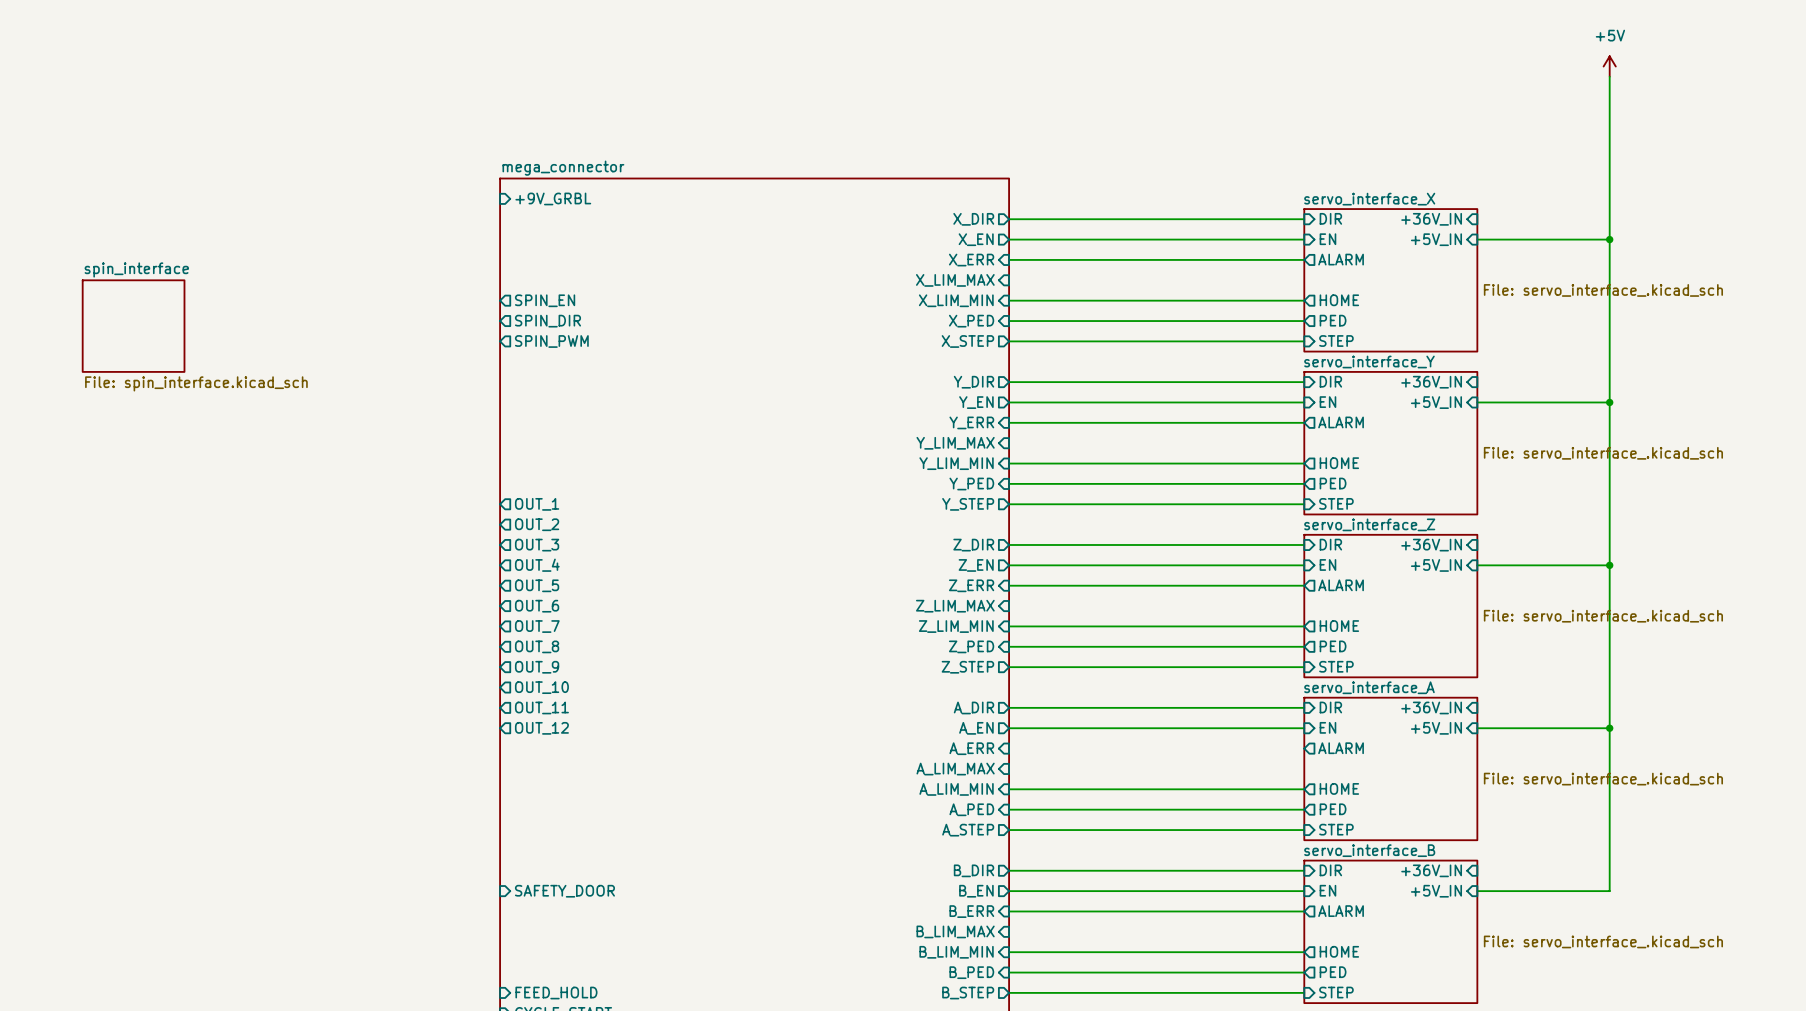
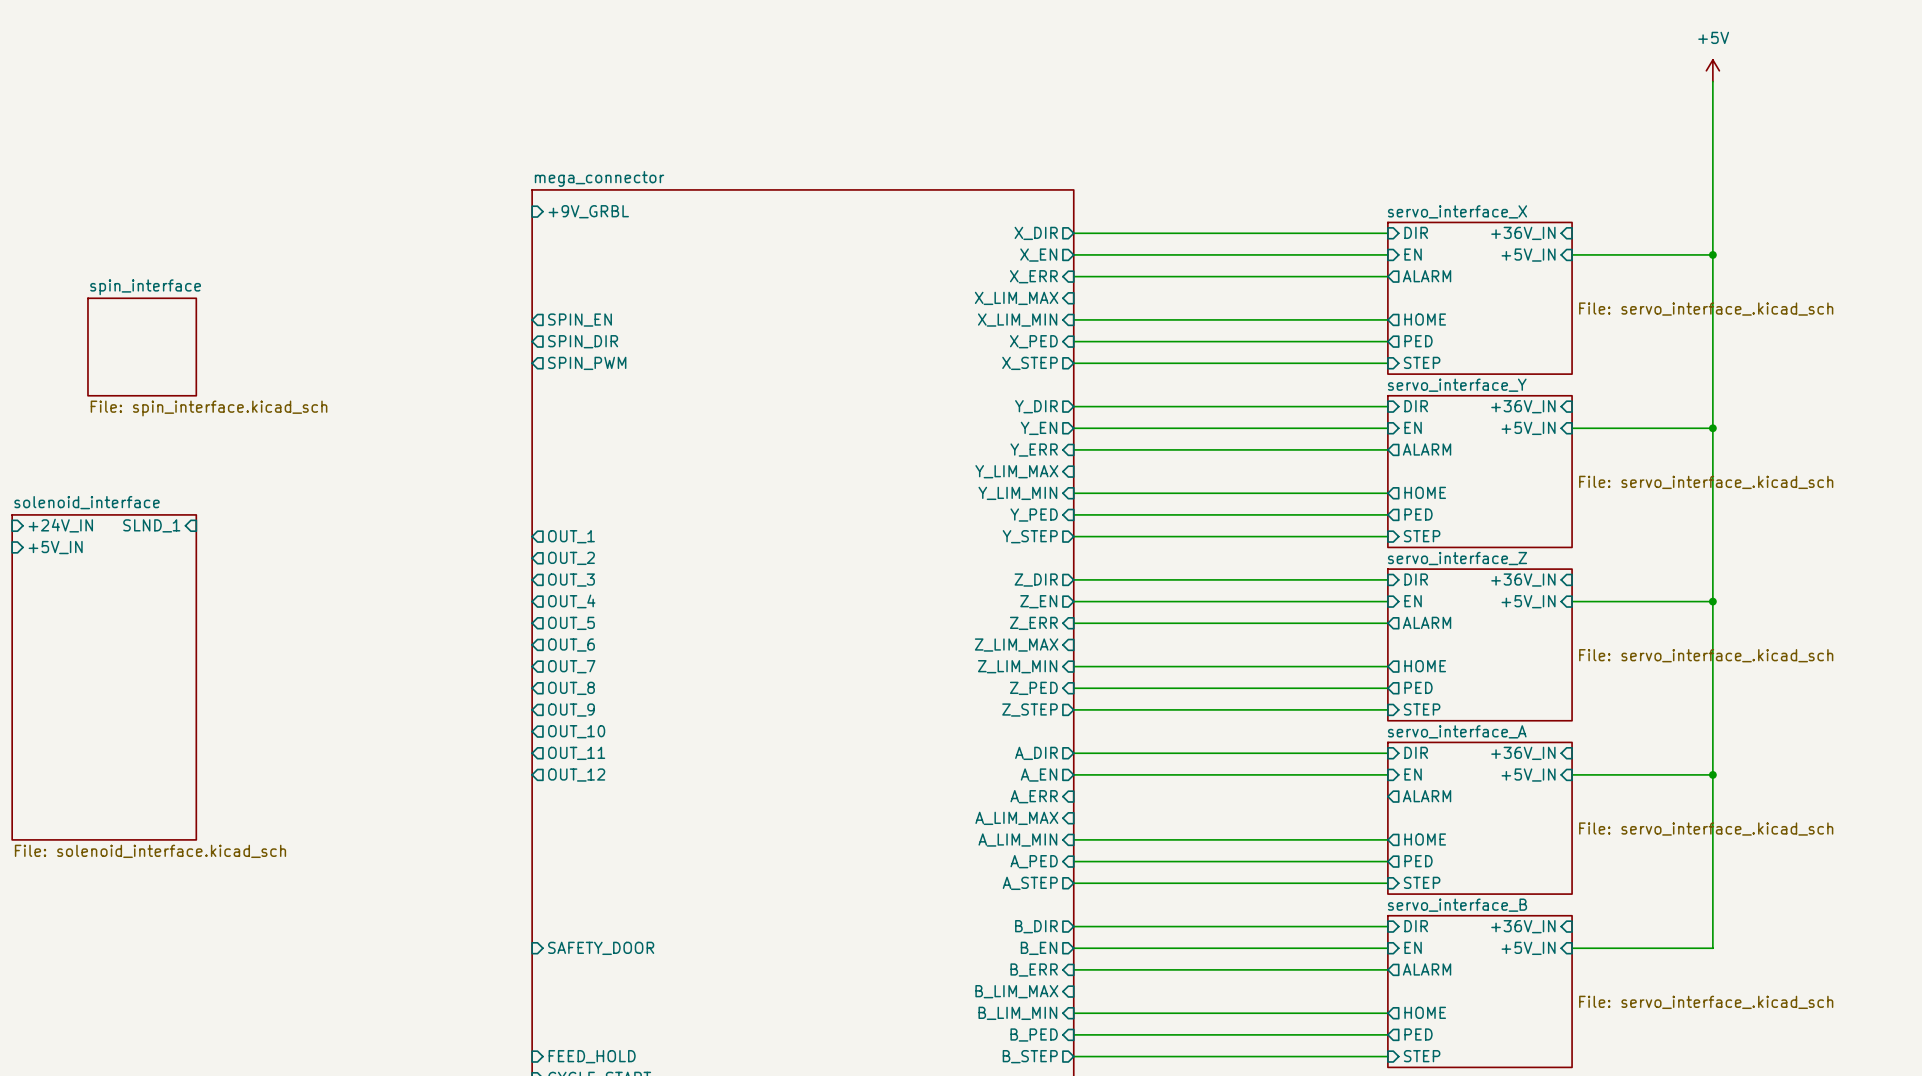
sheet pin: none -> +24V_IN (60, 525)
sheet pin: none -> SLND_1 (151, 525)
sheet pin: none -> +5V_IN (55, 547)
sheet solenoid_interface: none -> File: solenoid_interface.kicad_sch (104, 677)

